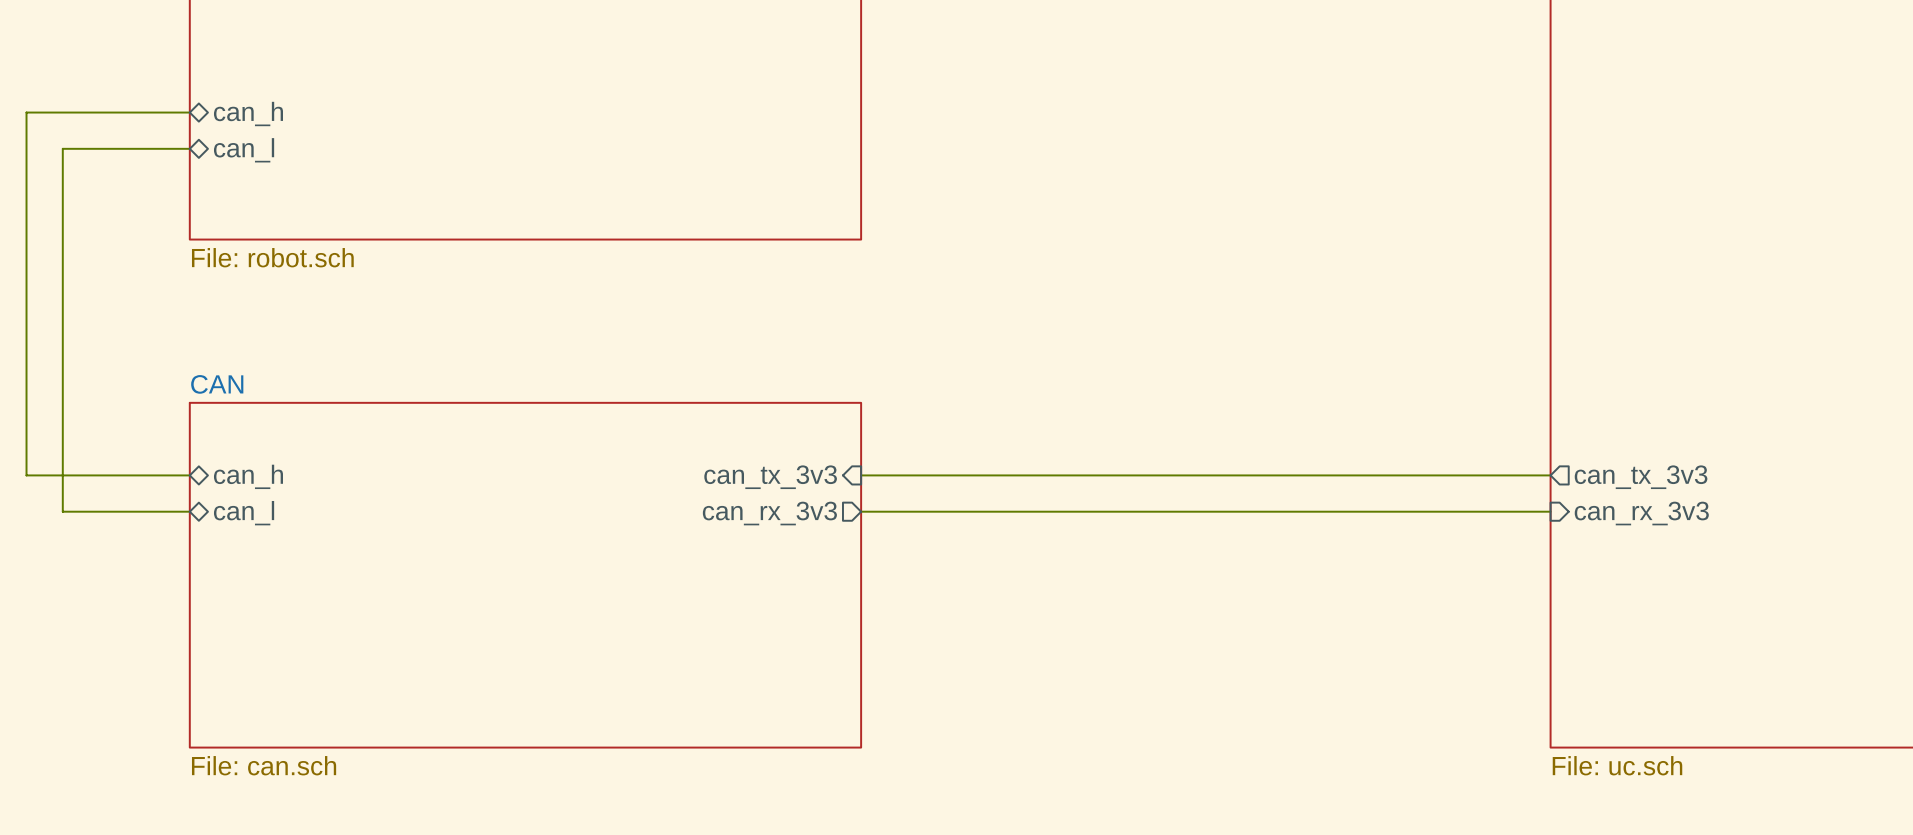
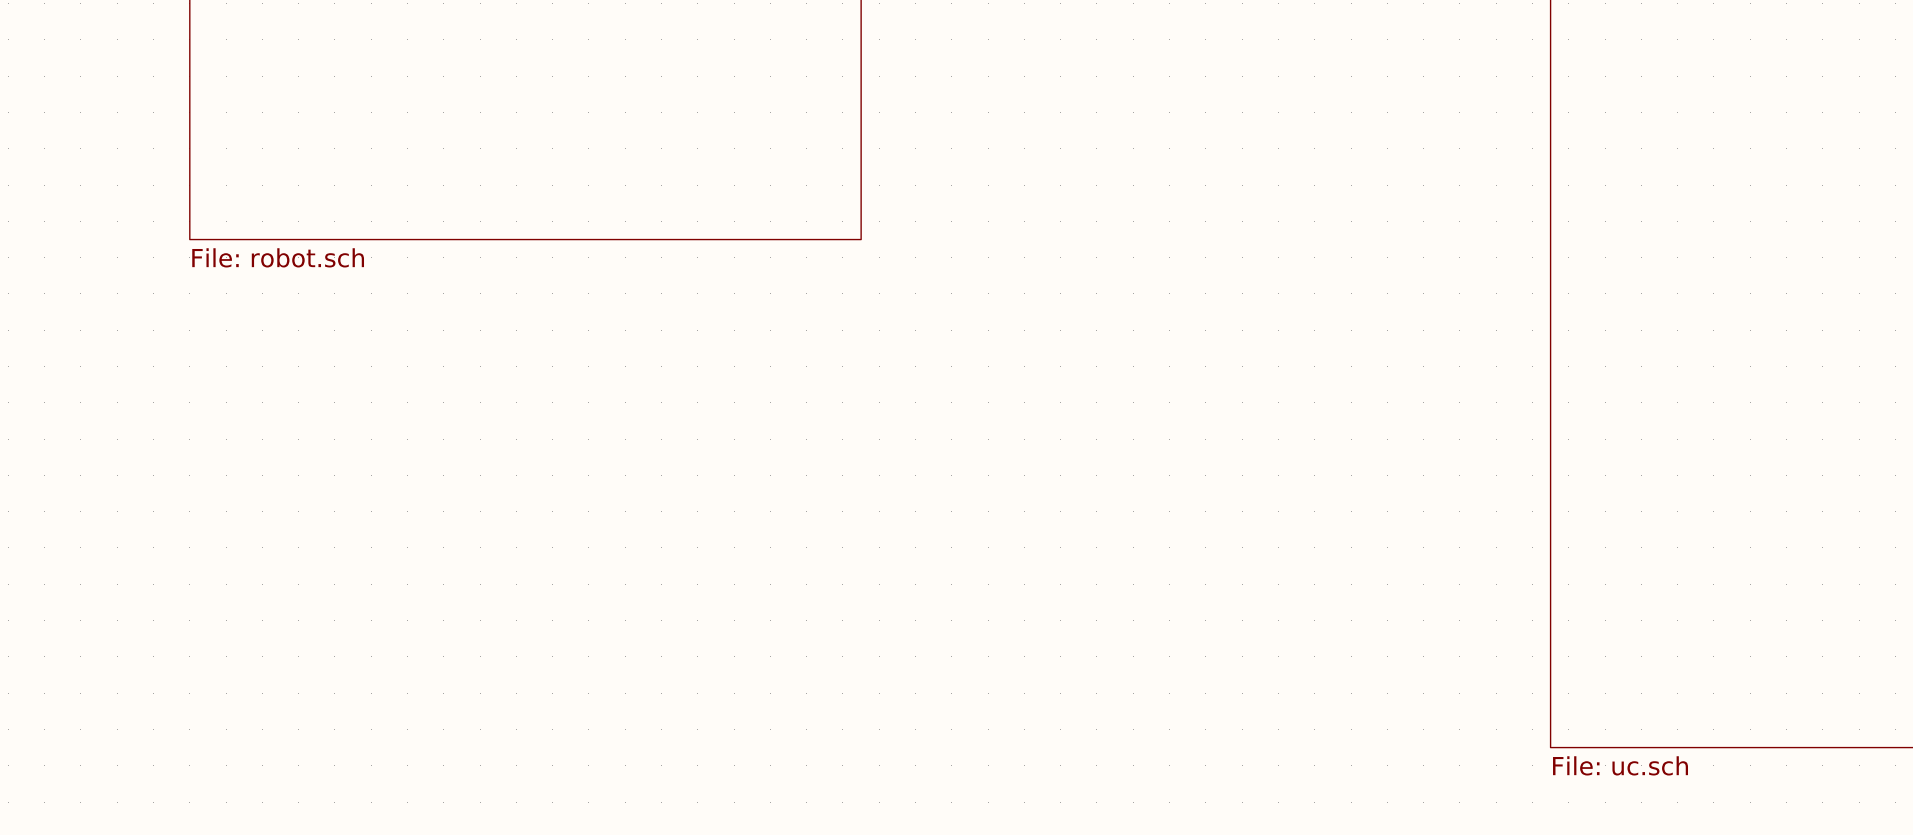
wire: (189, 112) (26, 112) (26, 475) (189, 475) -> none
sheet pin: can_h (248, 114) -> none
wire: (189, 148) (62, 148) (62, 511) (189, 511) -> none
sheet pin: can_l (244, 150) -> none
wire: (861, 475) (1550, 475) -> none
sheet pin: can_h (248, 476) -> none
sheet pin: can_tx_3v3 (770, 477) -> none
sheet pin: can_tx_3v3 (1641, 477) -> none
wire: (861, 511) (1550, 511) -> none
sheet pin: can_l (244, 513) -> none
sheet pin: can_rx_3v3 (769, 513) -> none
sheet pin: can_rx_3v3 (1641, 513) -> none
sheet CAN: File: can.sch (525, 575) -> none

